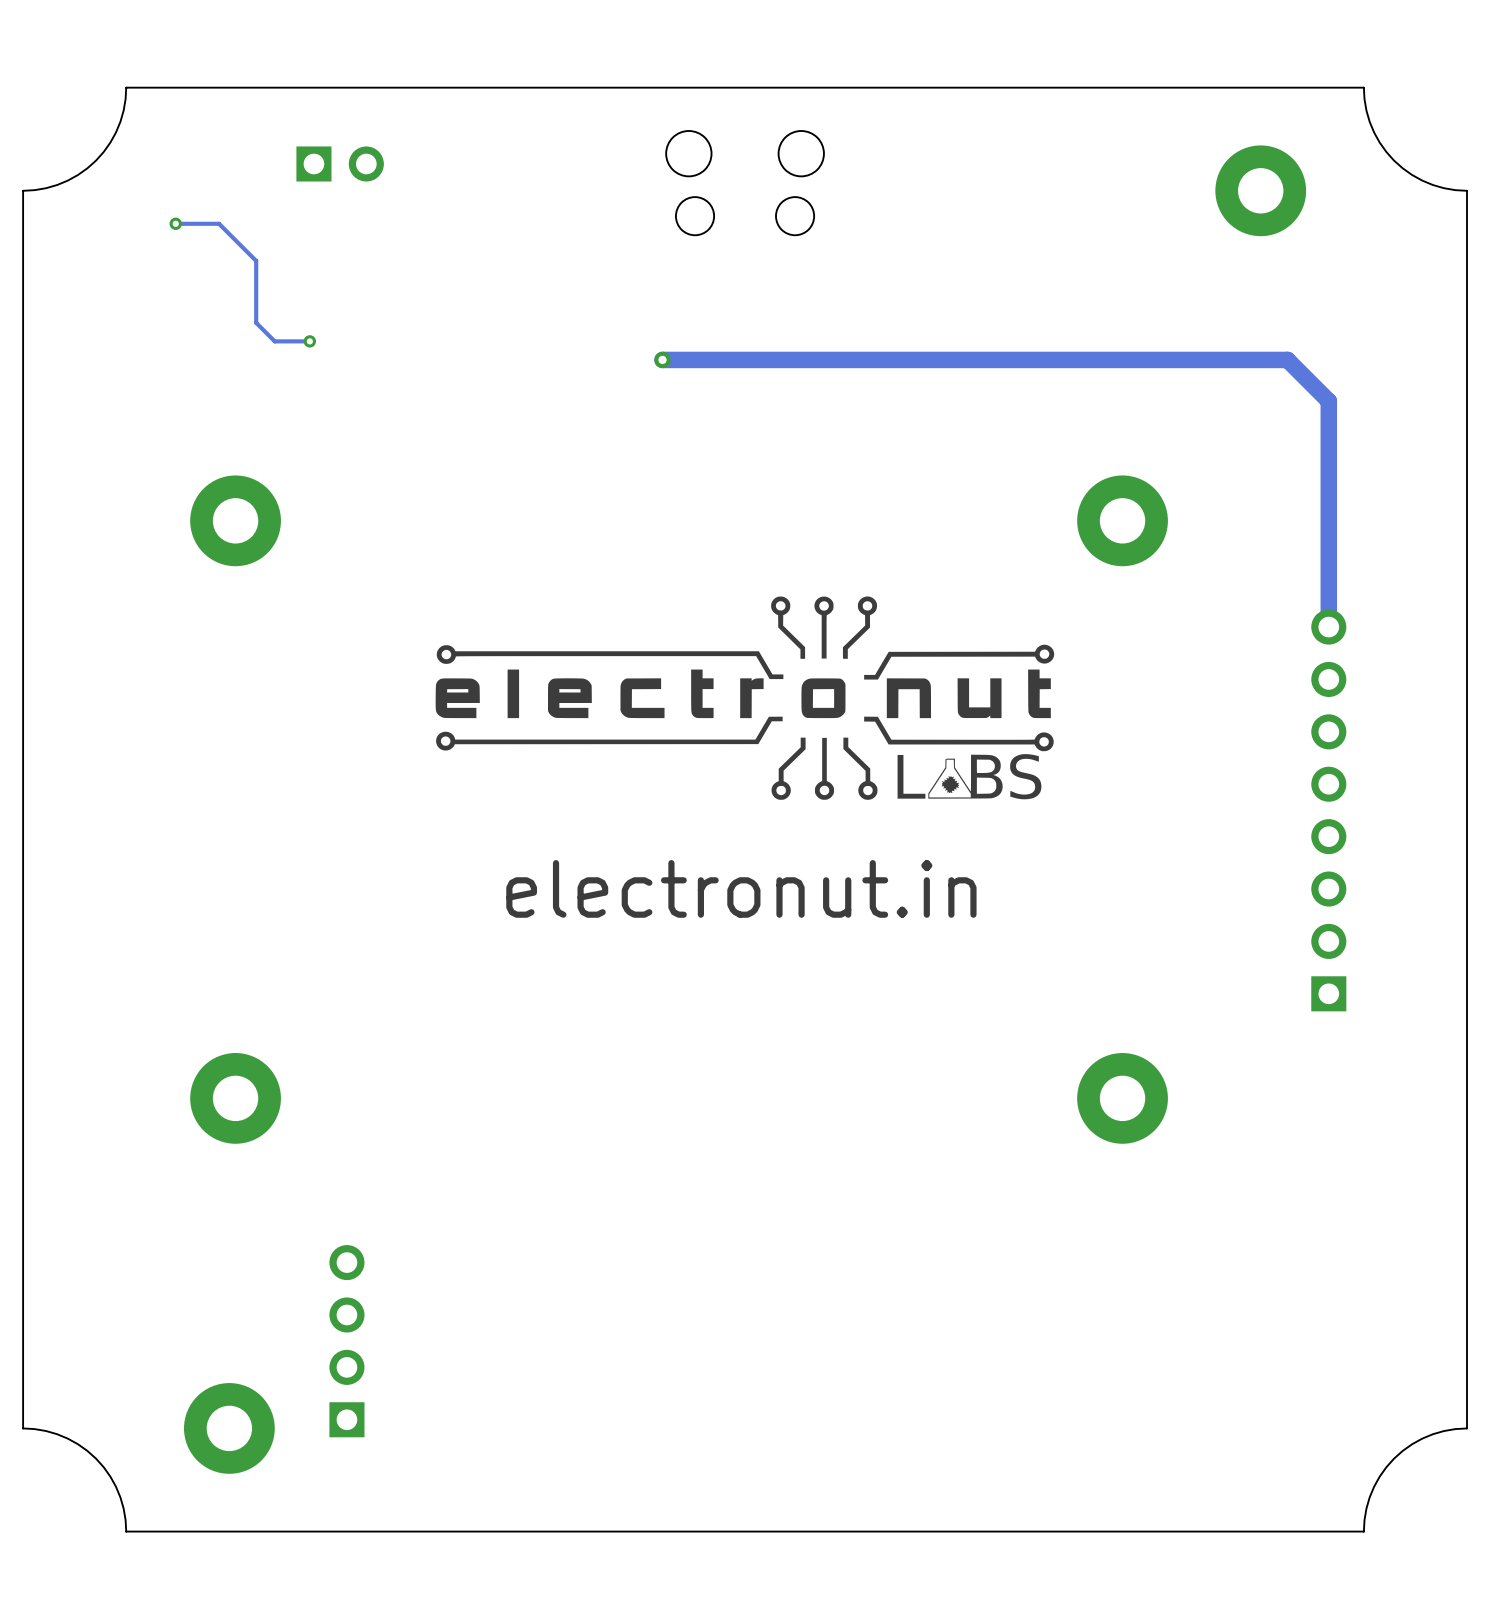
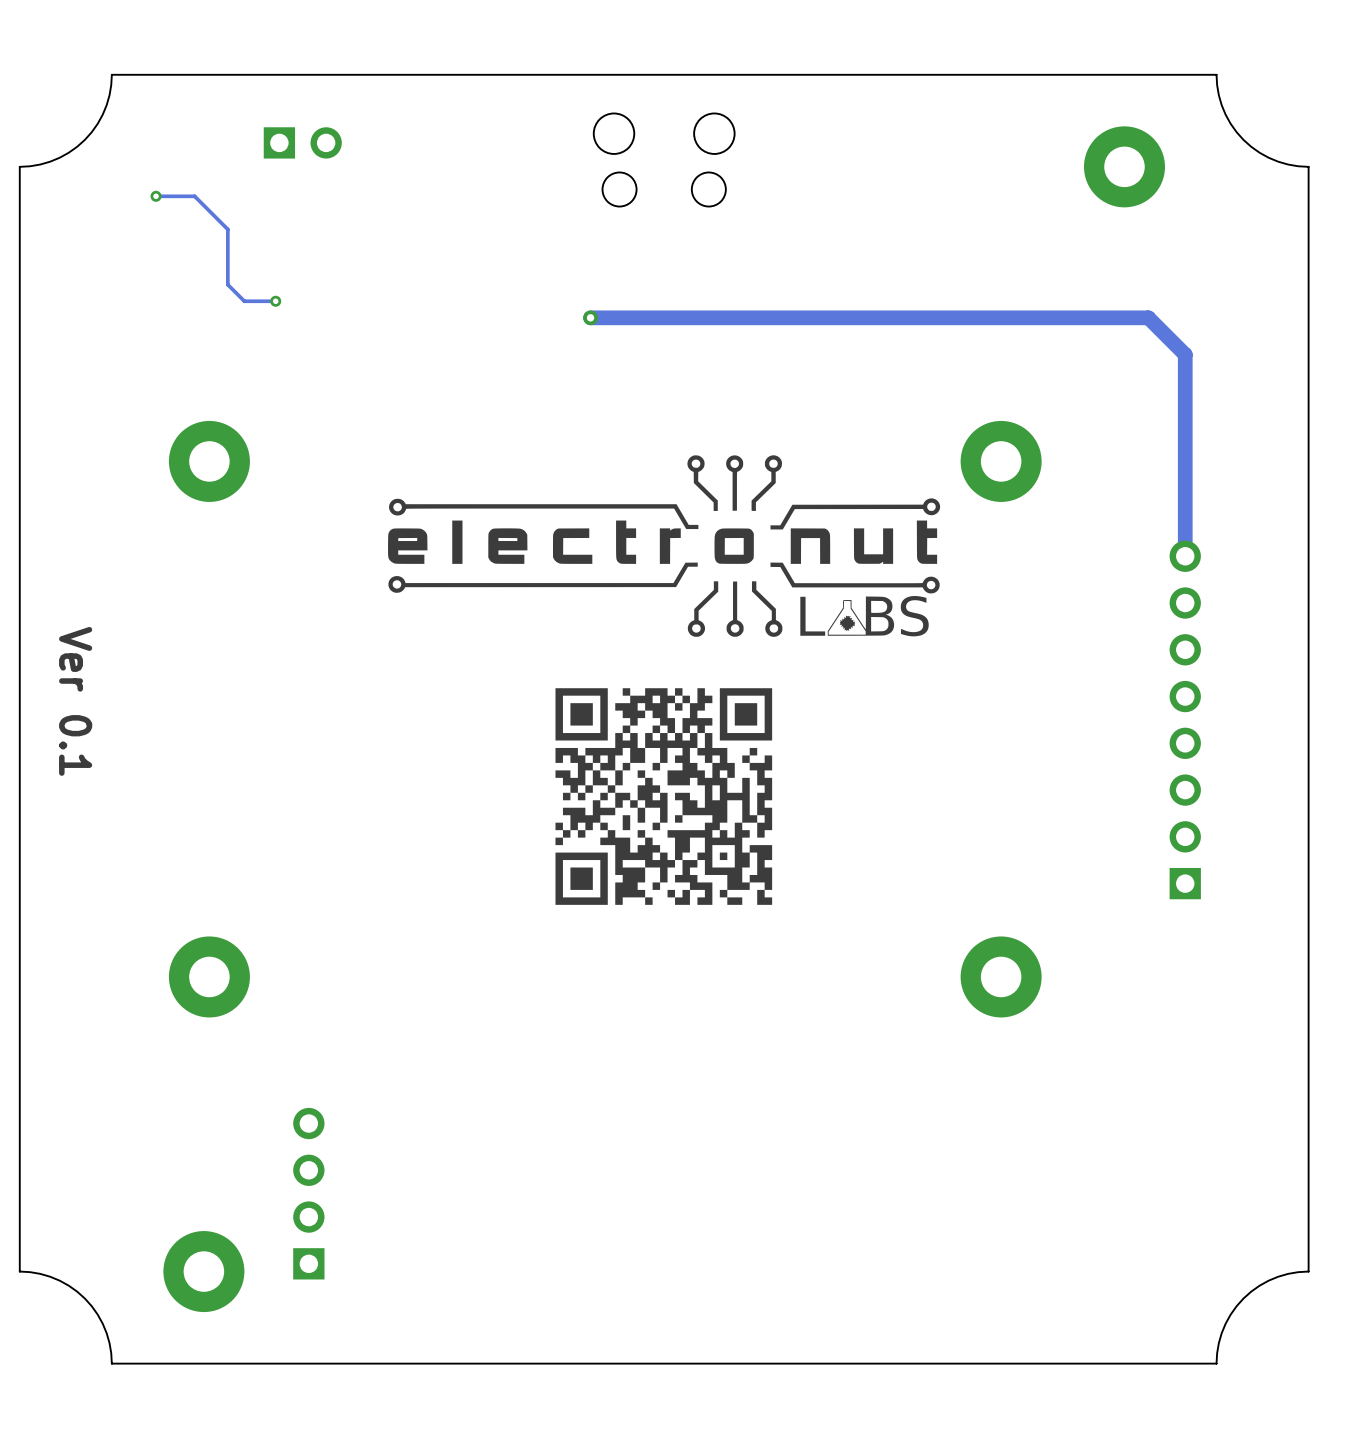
drawing position: (744, 698) -> (664, 546)
drawing: none -> [555, 688, 773, 905]
text: none -> Ver 0.1 (75, 701)
text: electronut.in (741, 888) -> none

